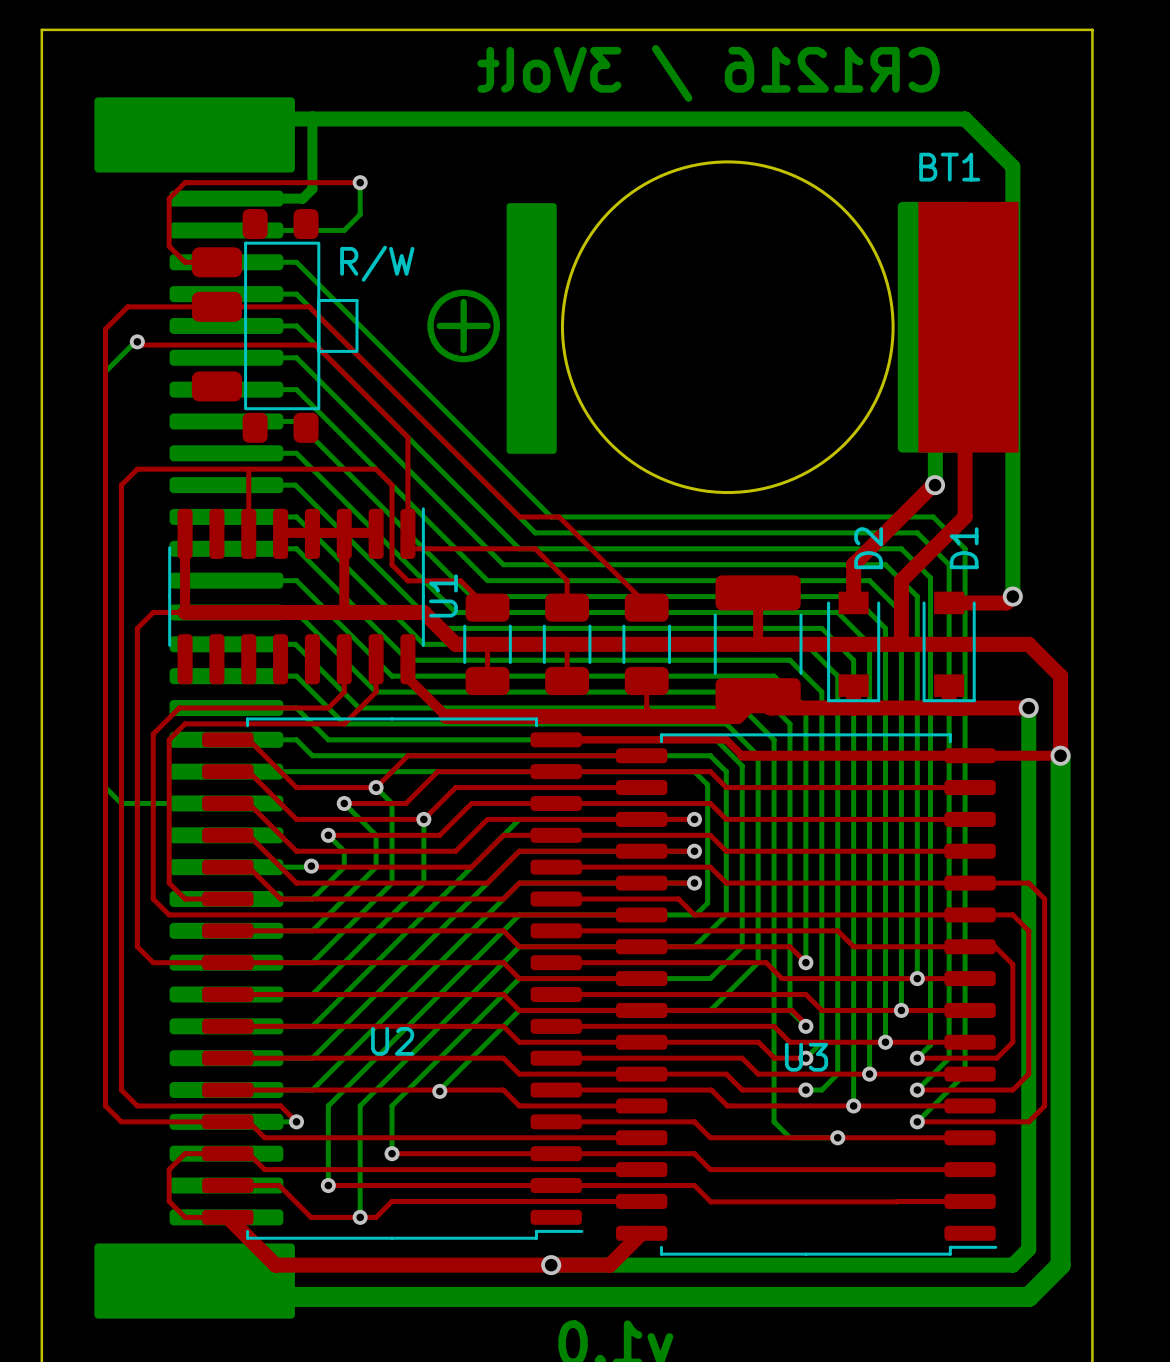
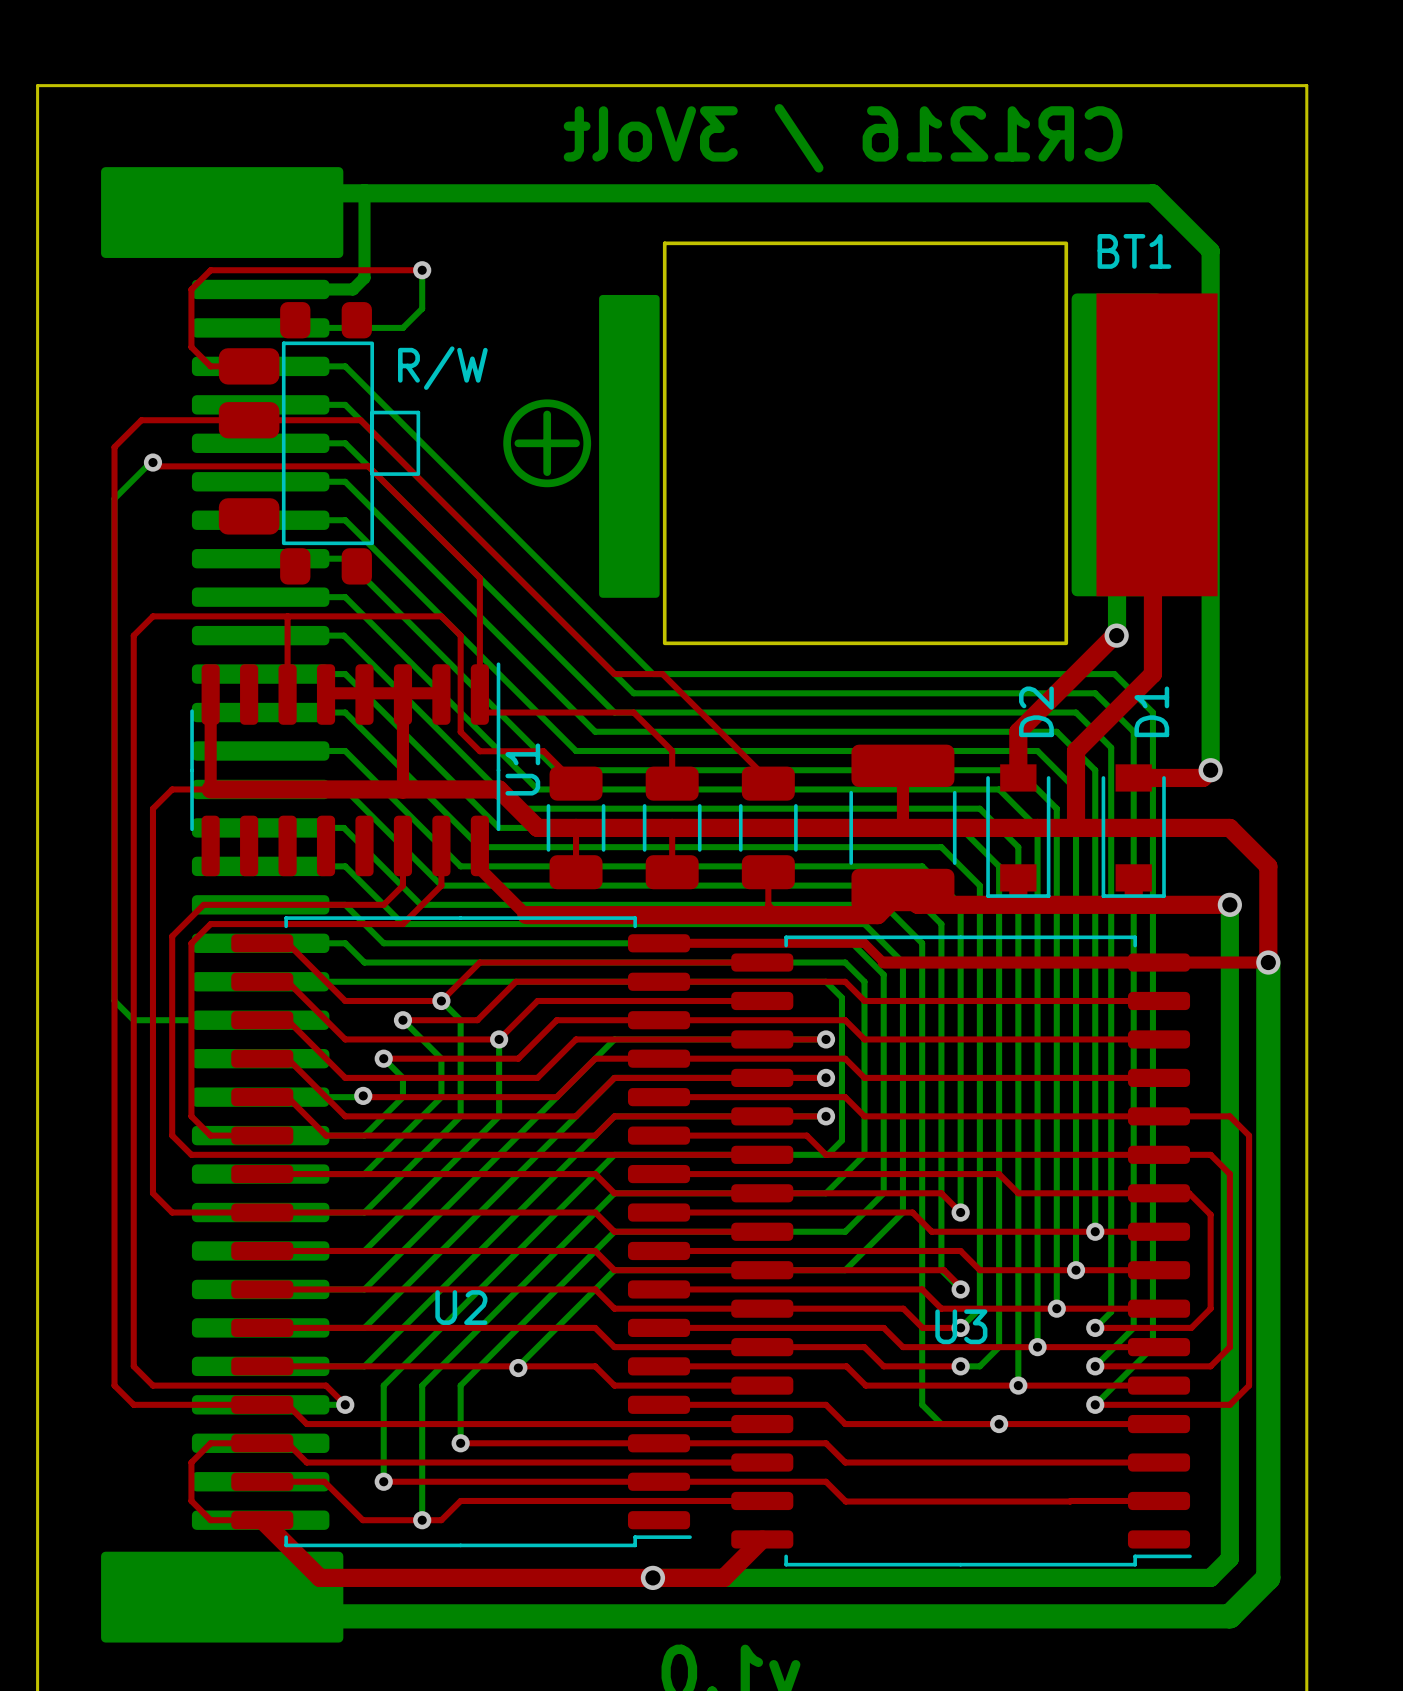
BT1 footprint: [506, 160, 1019, 495] -> [599, 241, 1218, 646]

